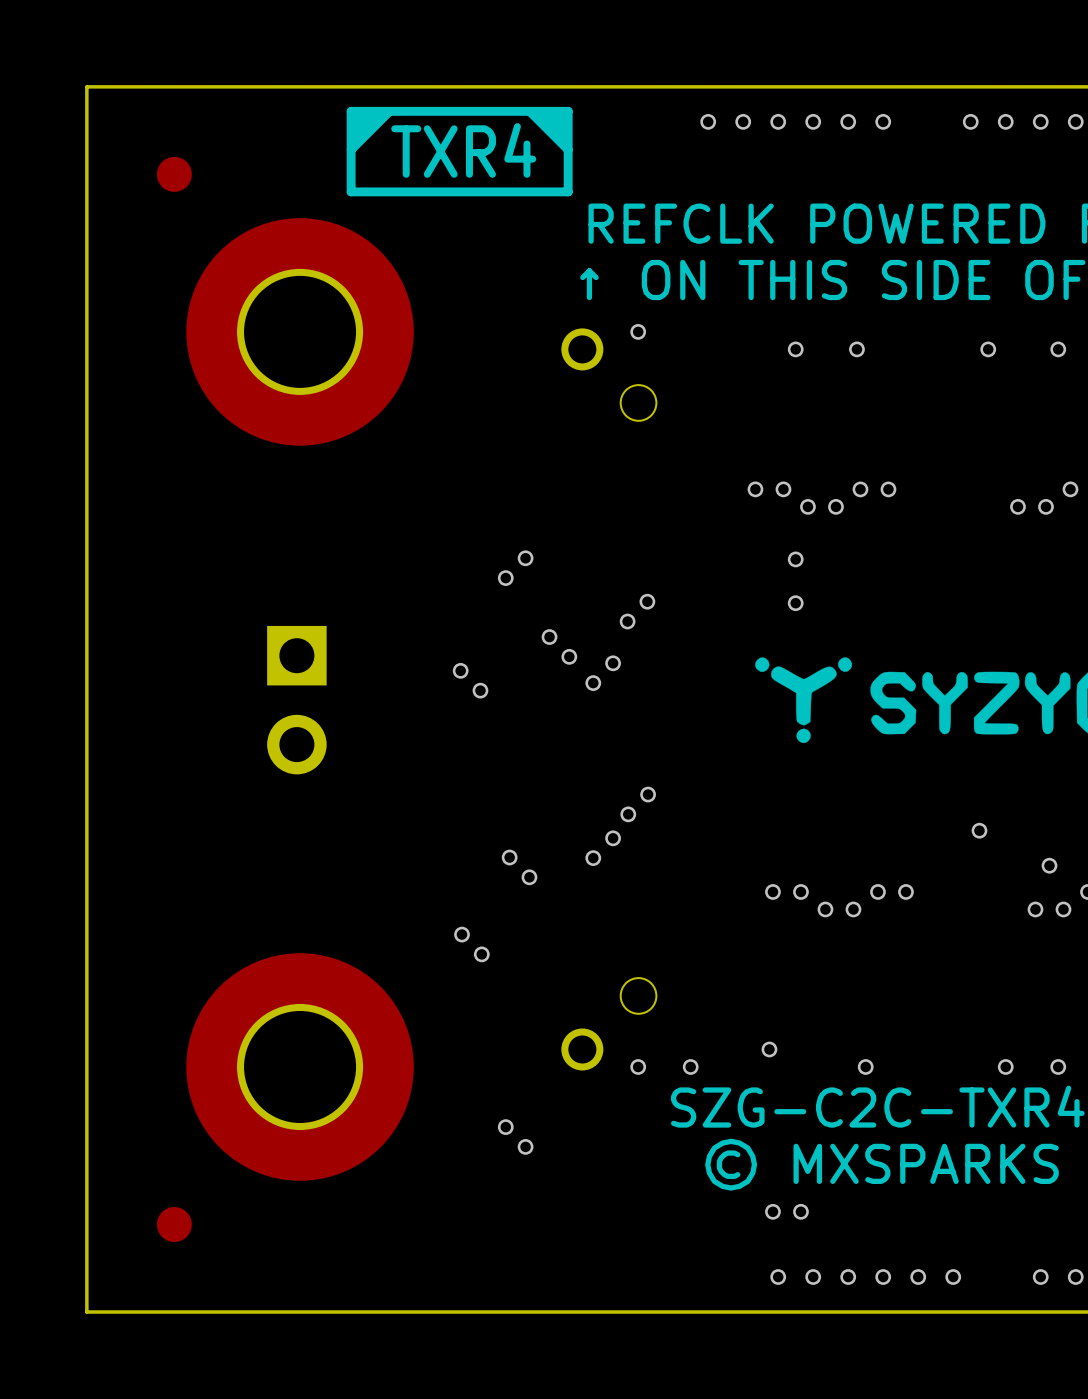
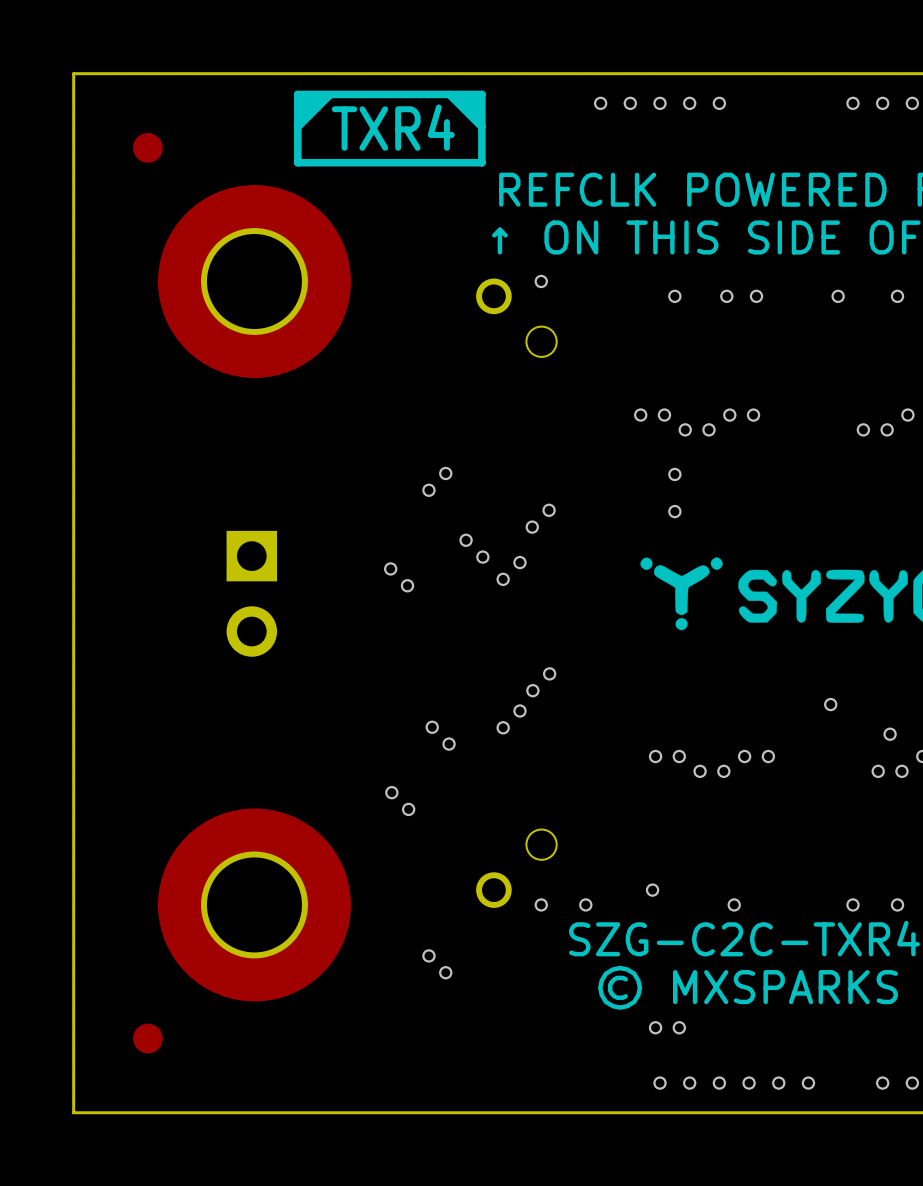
via: (883, 121) -> none
via: (970, 121) -> none
via: none -> (756, 296)

